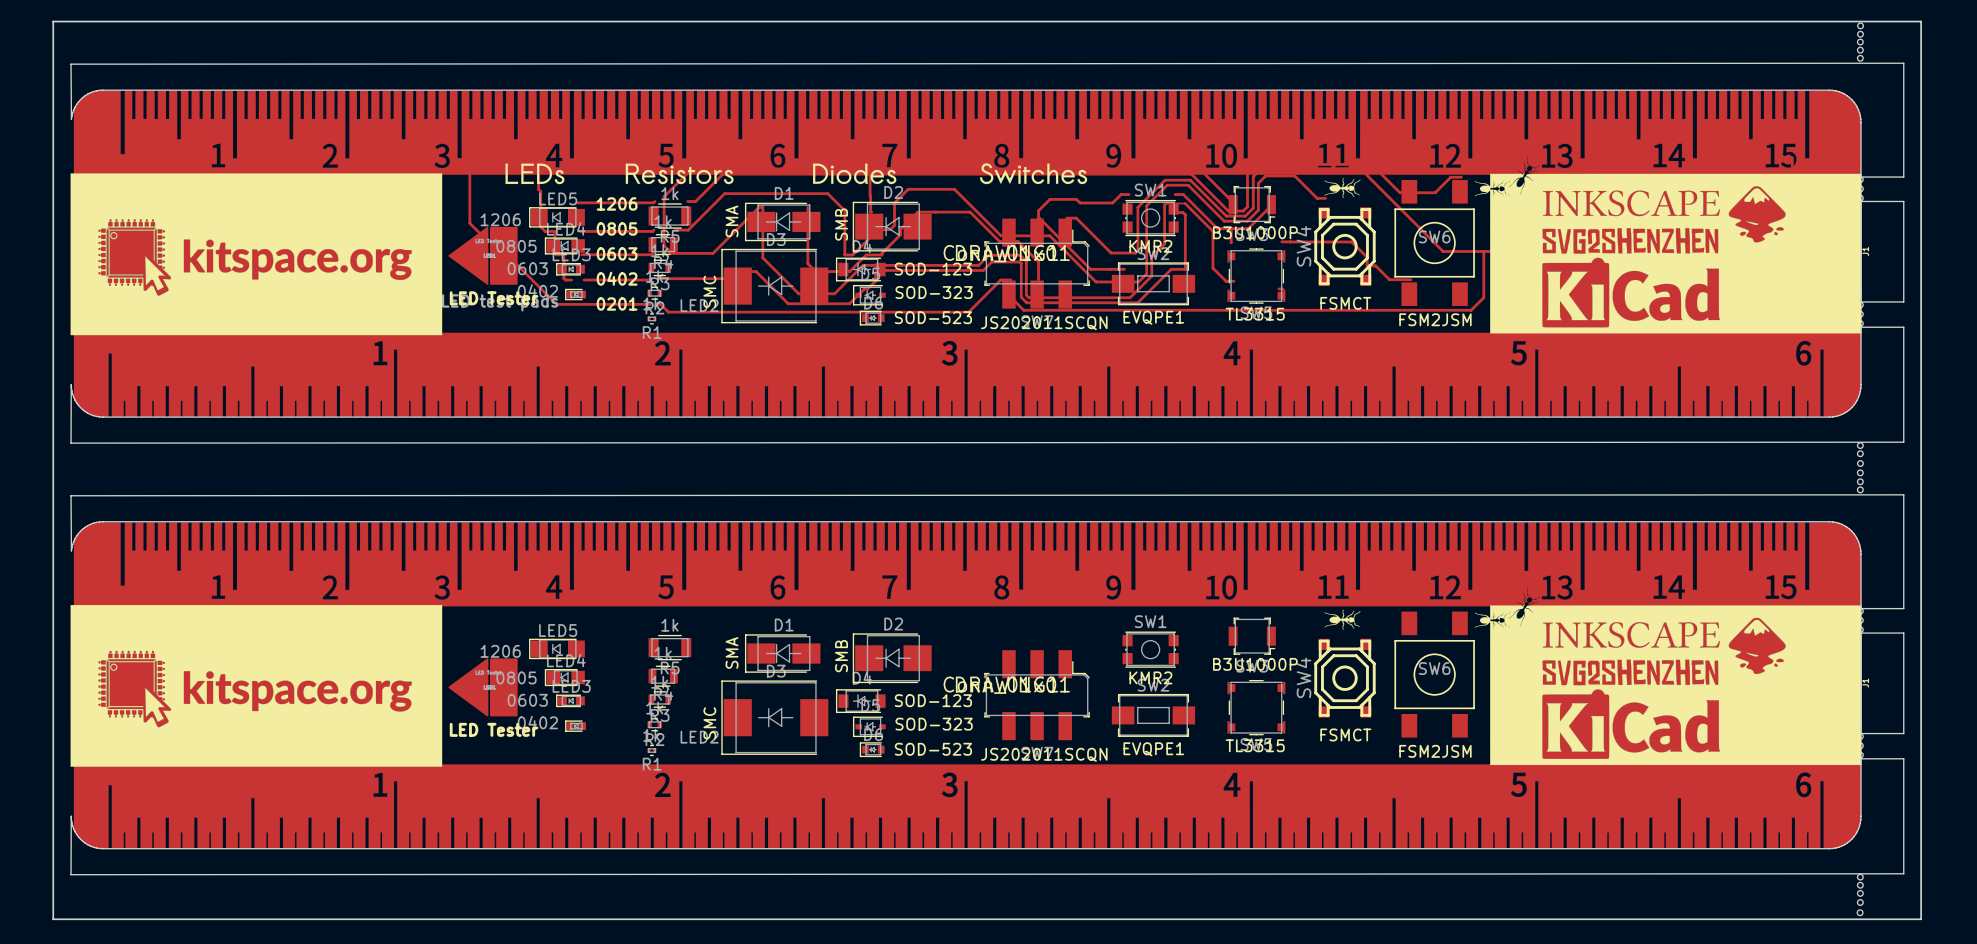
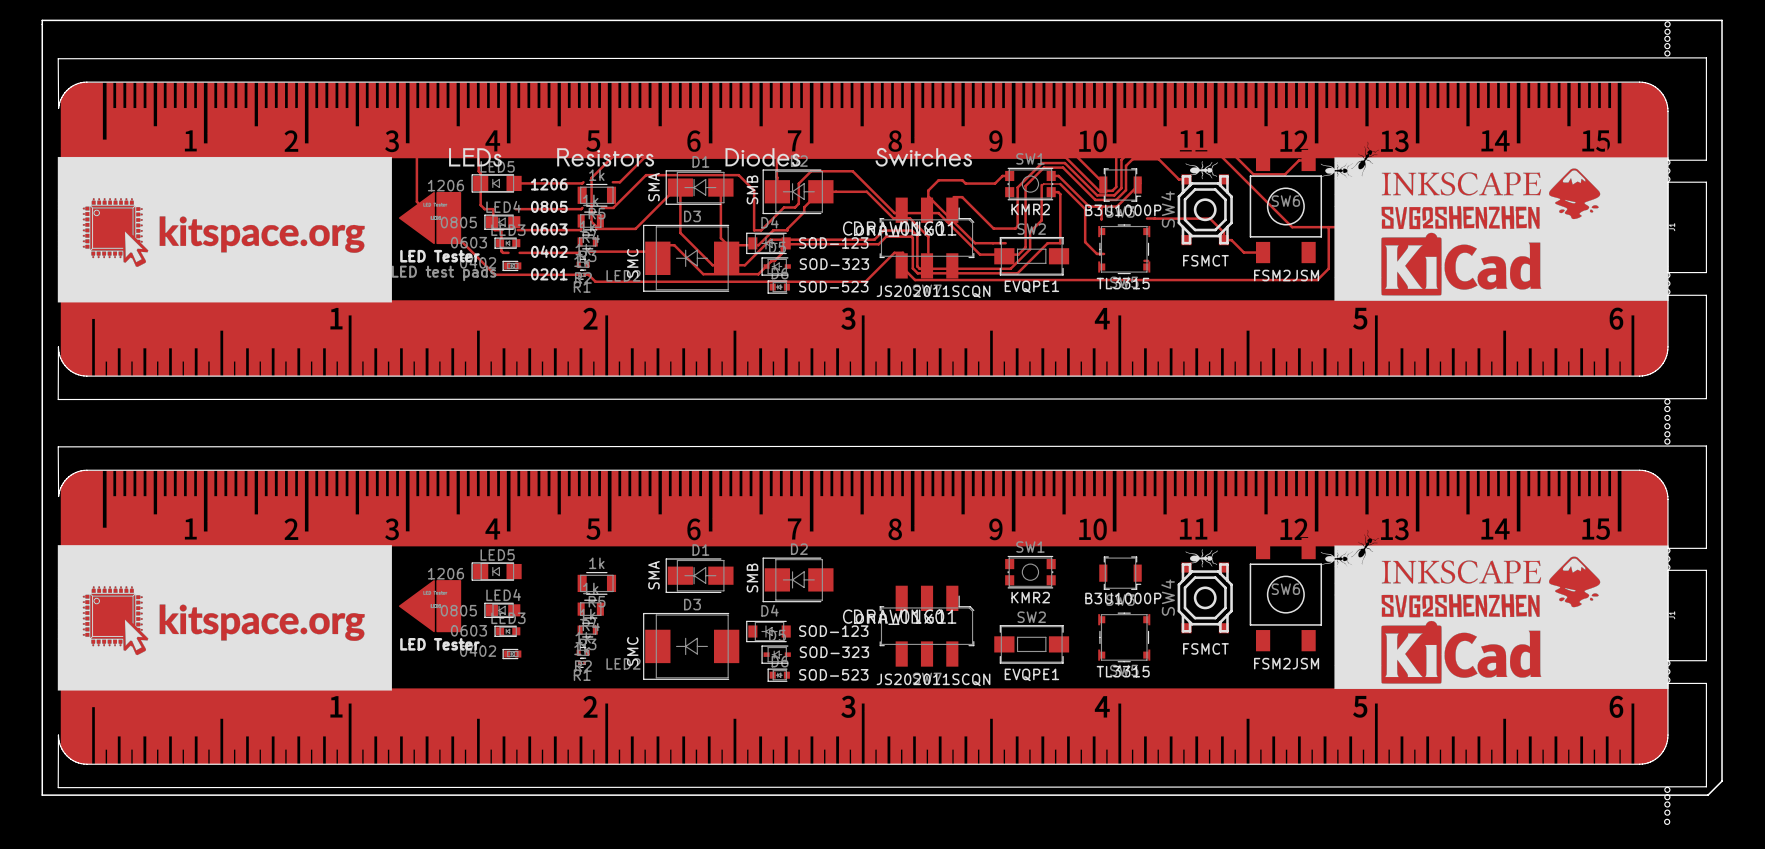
LED5 position: (556, 217) -> (496, 183)
SW1 position: (1150, 218) -> (1030, 184)
D1 position: (782, 221) -> (699, 187)
D2 position: (892, 226) -> (798, 191)
SW6 position: (1434, 242) -> (1285, 206)
SW4 position: (1344, 246) -> (1205, 209)
part position: (483, 255) -> (430, 218)
R1 position: (651, 318) -> (581, 274)
LED5 position: (556, 648) -> (496, 571)
SW1 position: (1150, 649) -> (1030, 572)
D1 position: (782, 653) -> (699, 575)
D2 position: (892, 658) -> (798, 579)
SW6 position: (1434, 674) -> (1285, 594)
SW4 position: (1344, 678) -> (1205, 597)
part position: (483, 687) -> (430, 606)
R1 position: (651, 750) -> (581, 662)
board edge: (1921, 867) (1921, 919) (53, 919) (53, 883) -> (1722, 781) (1708, 795) (42, 795)

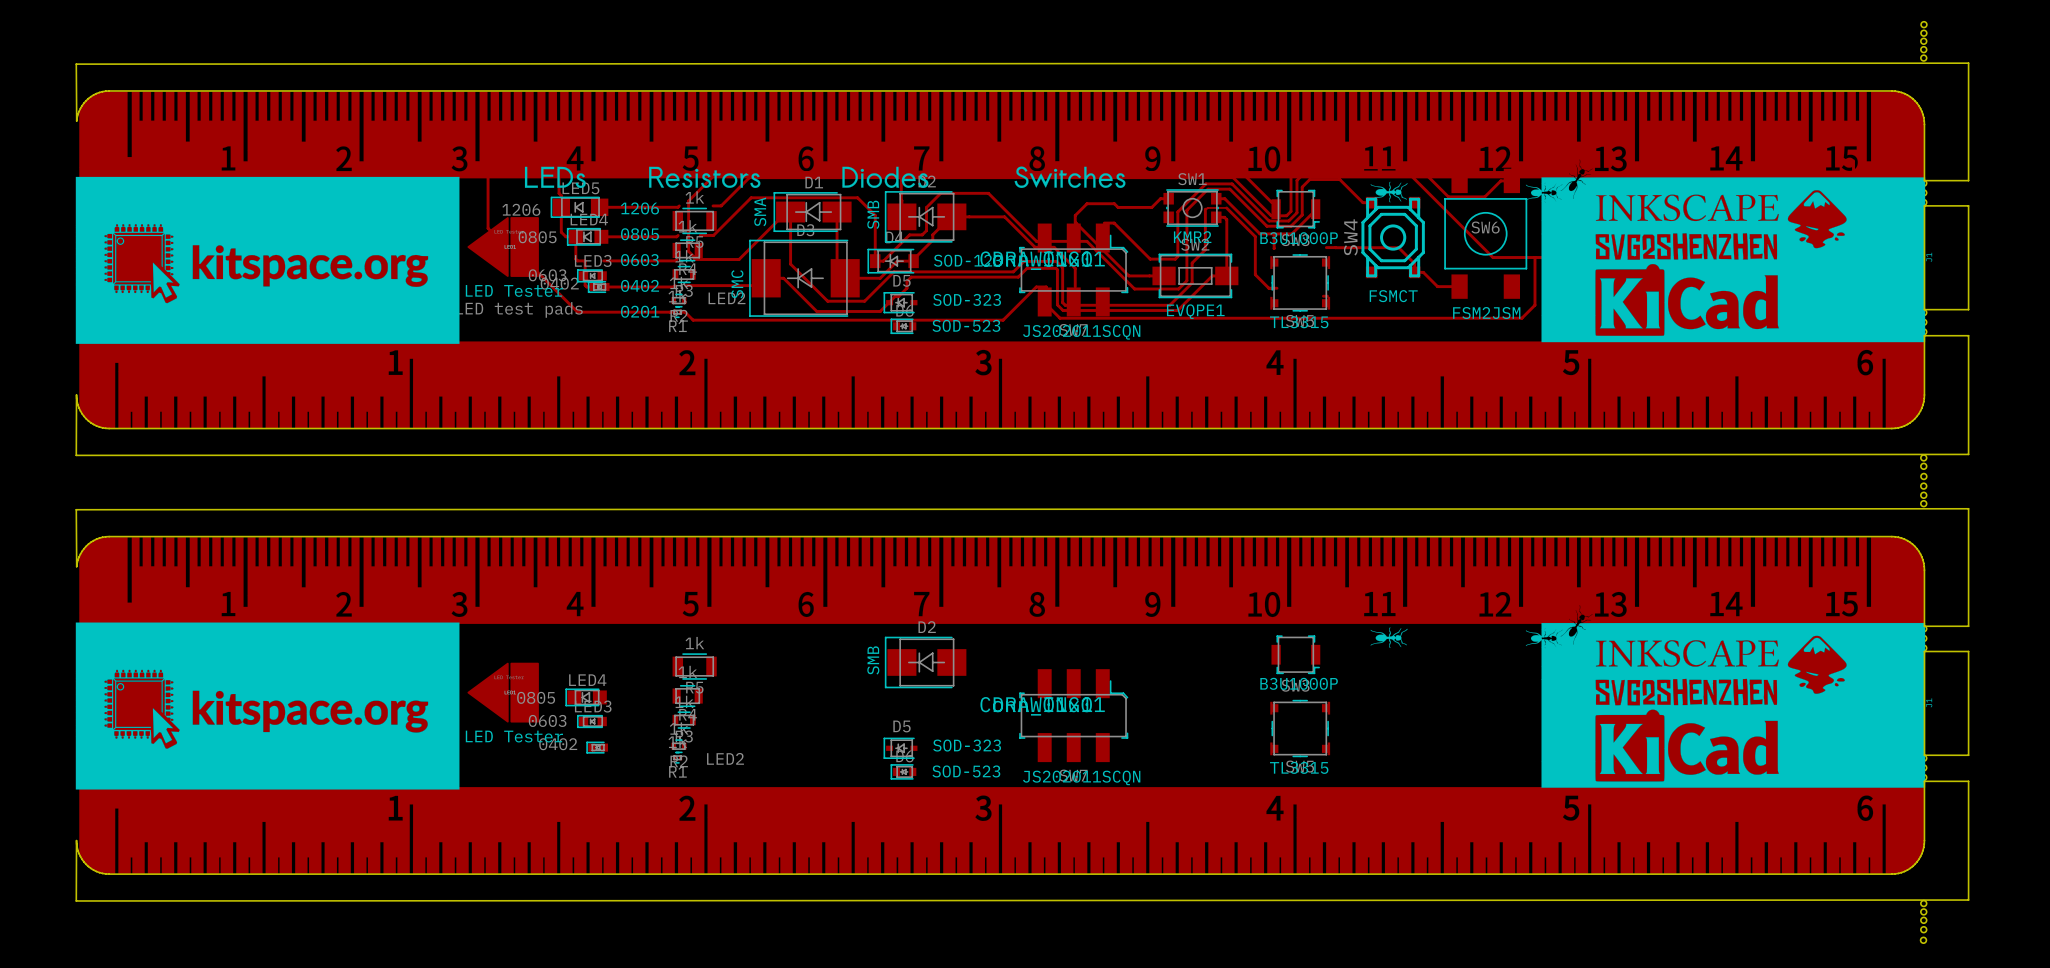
board edge: (42, 20) (42, 795) (1708, 795) (1722, 781) (1722, 20) (42, 20) -> none
LED4 position: (502, 222) -> (587, 236)
D4 position: (768, 243) -> (893, 261)
SW2 position: (1031, 256) -> (1195, 275)
D3 position: (691, 258) -> (804, 278)
LED2 position: (511, 265) -> (598, 287)
LED5: 1206 (496, 571) -> none
SW1: KMR2 (1030, 572) -> none
D1: SMA (699, 575) -> none
SW6: FSM2JSM (1285, 594) -> none
SW4: FSMCT (1205, 597) -> none
D4: SOD-123 (768, 631) -> none
SW2: EVQPE1 (1031, 644) -> none
D3: SMC (691, 646) -> none

